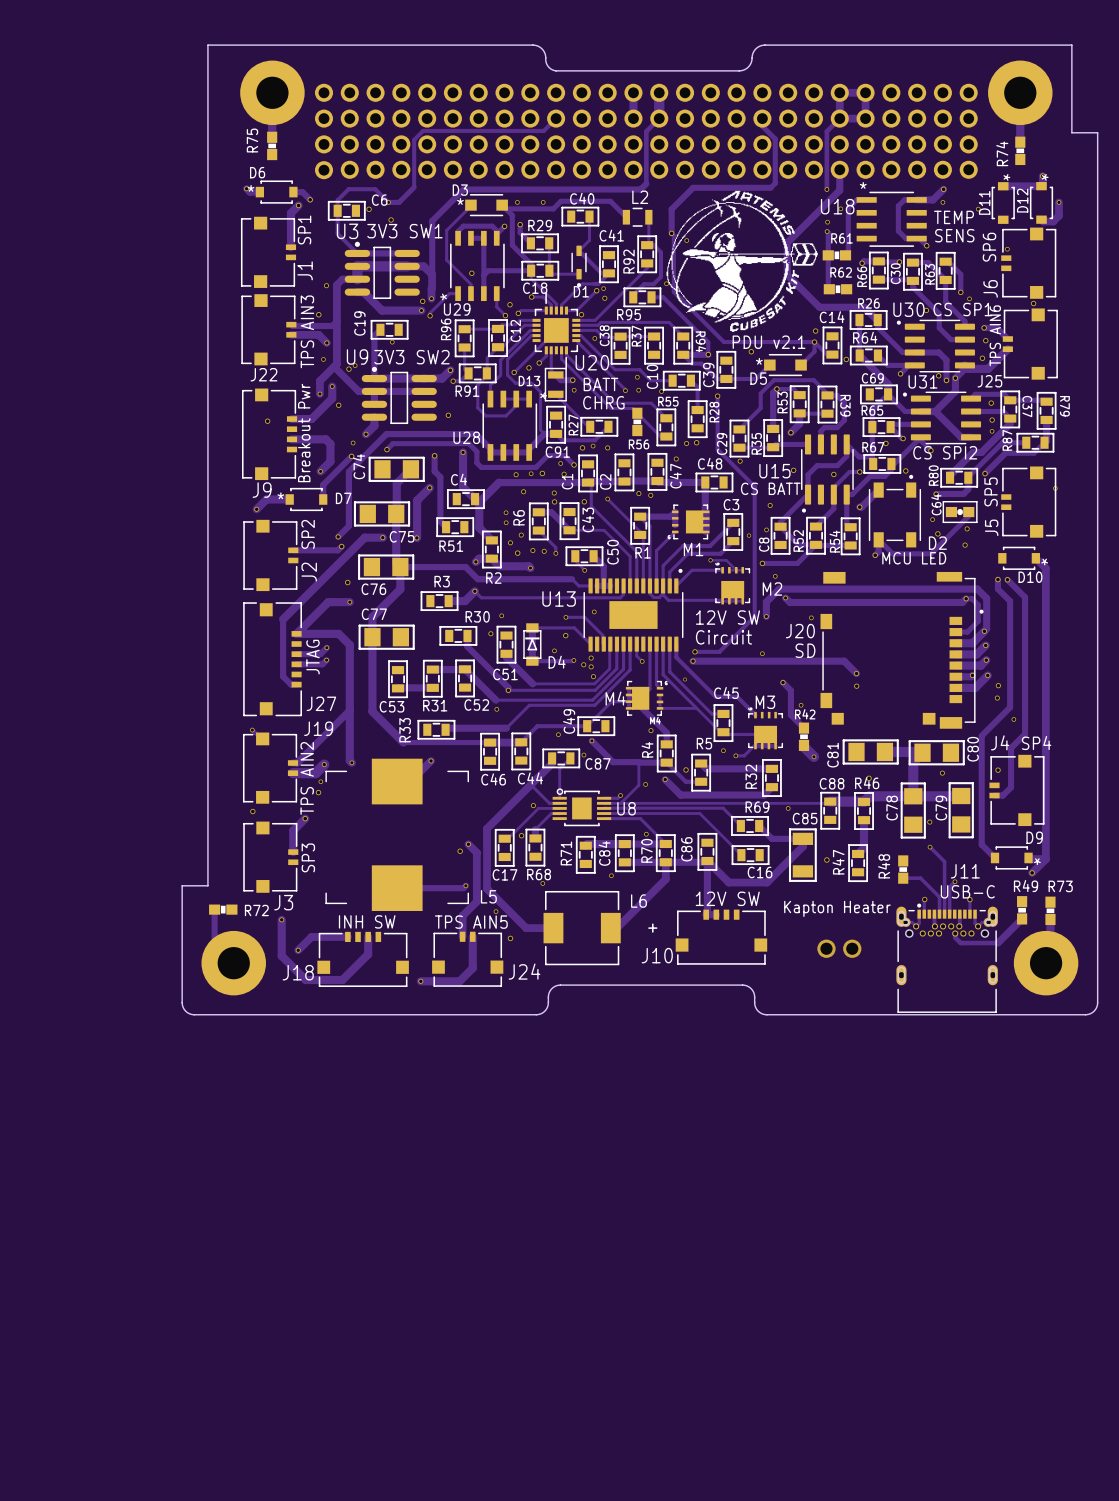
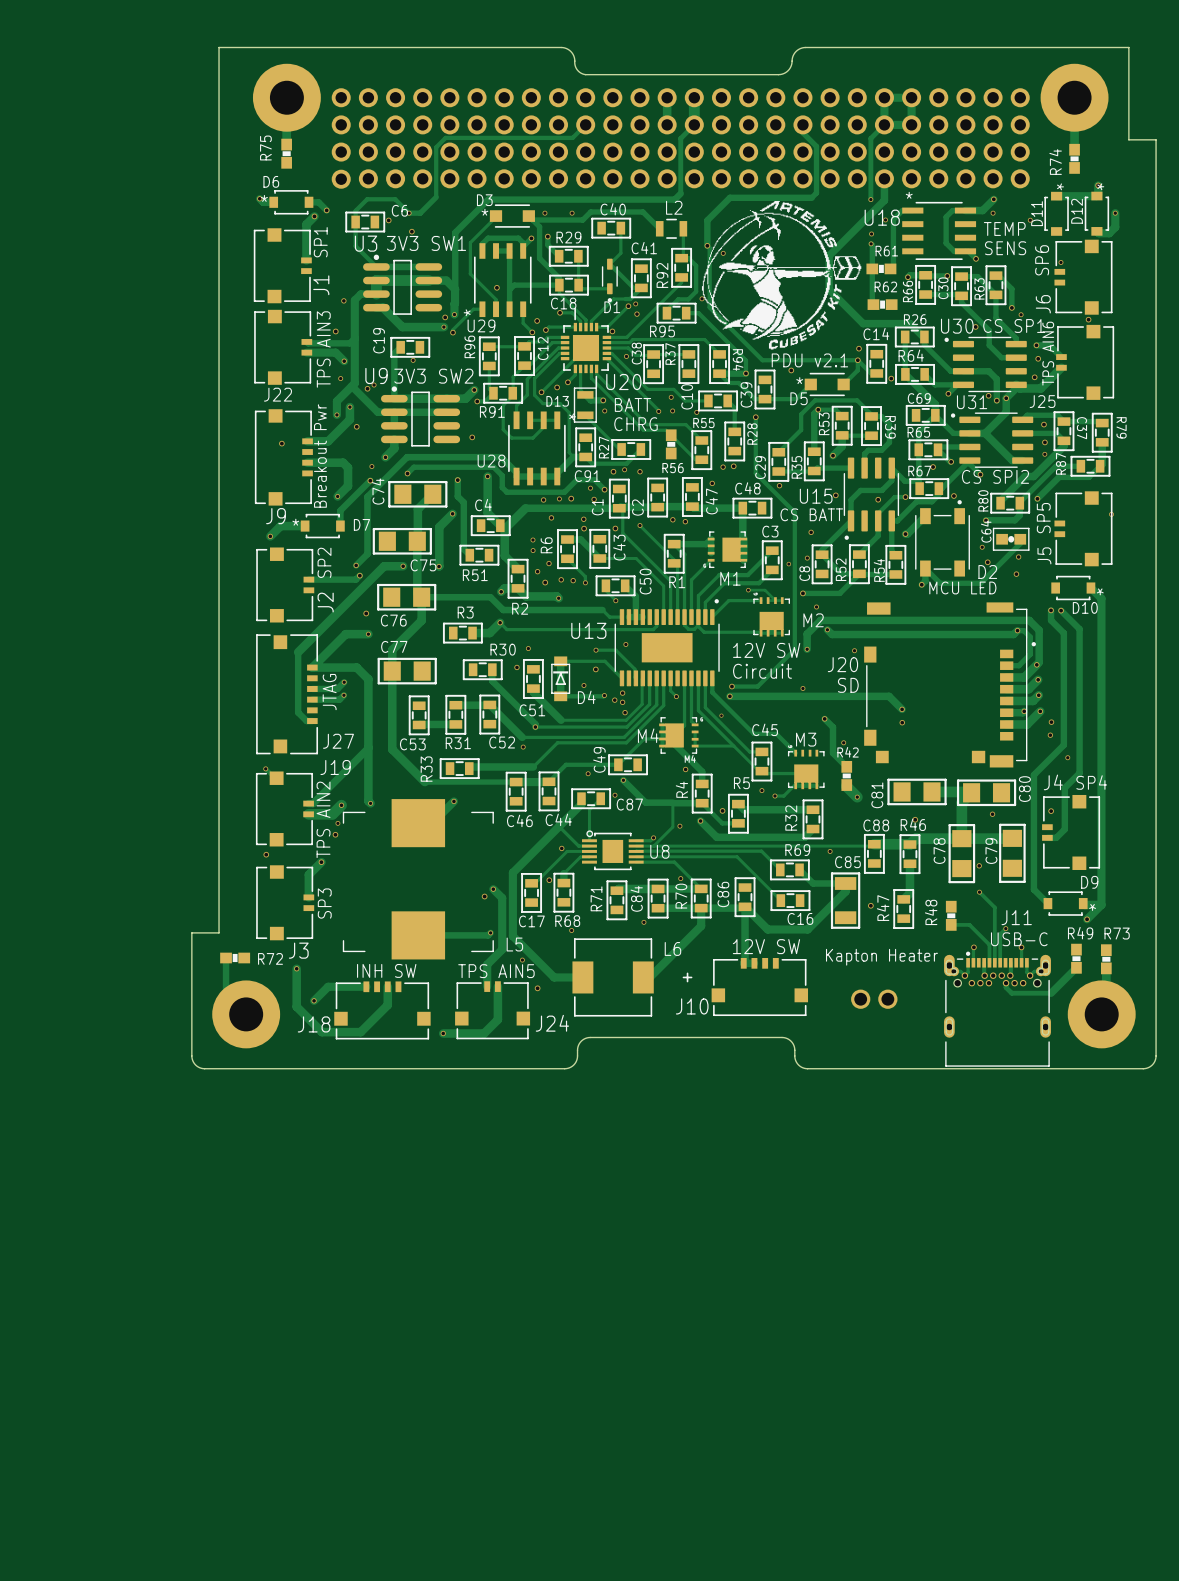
via: (826, 948) -> none
part: none -> (874, 999)
via: (852, 948) -> none

